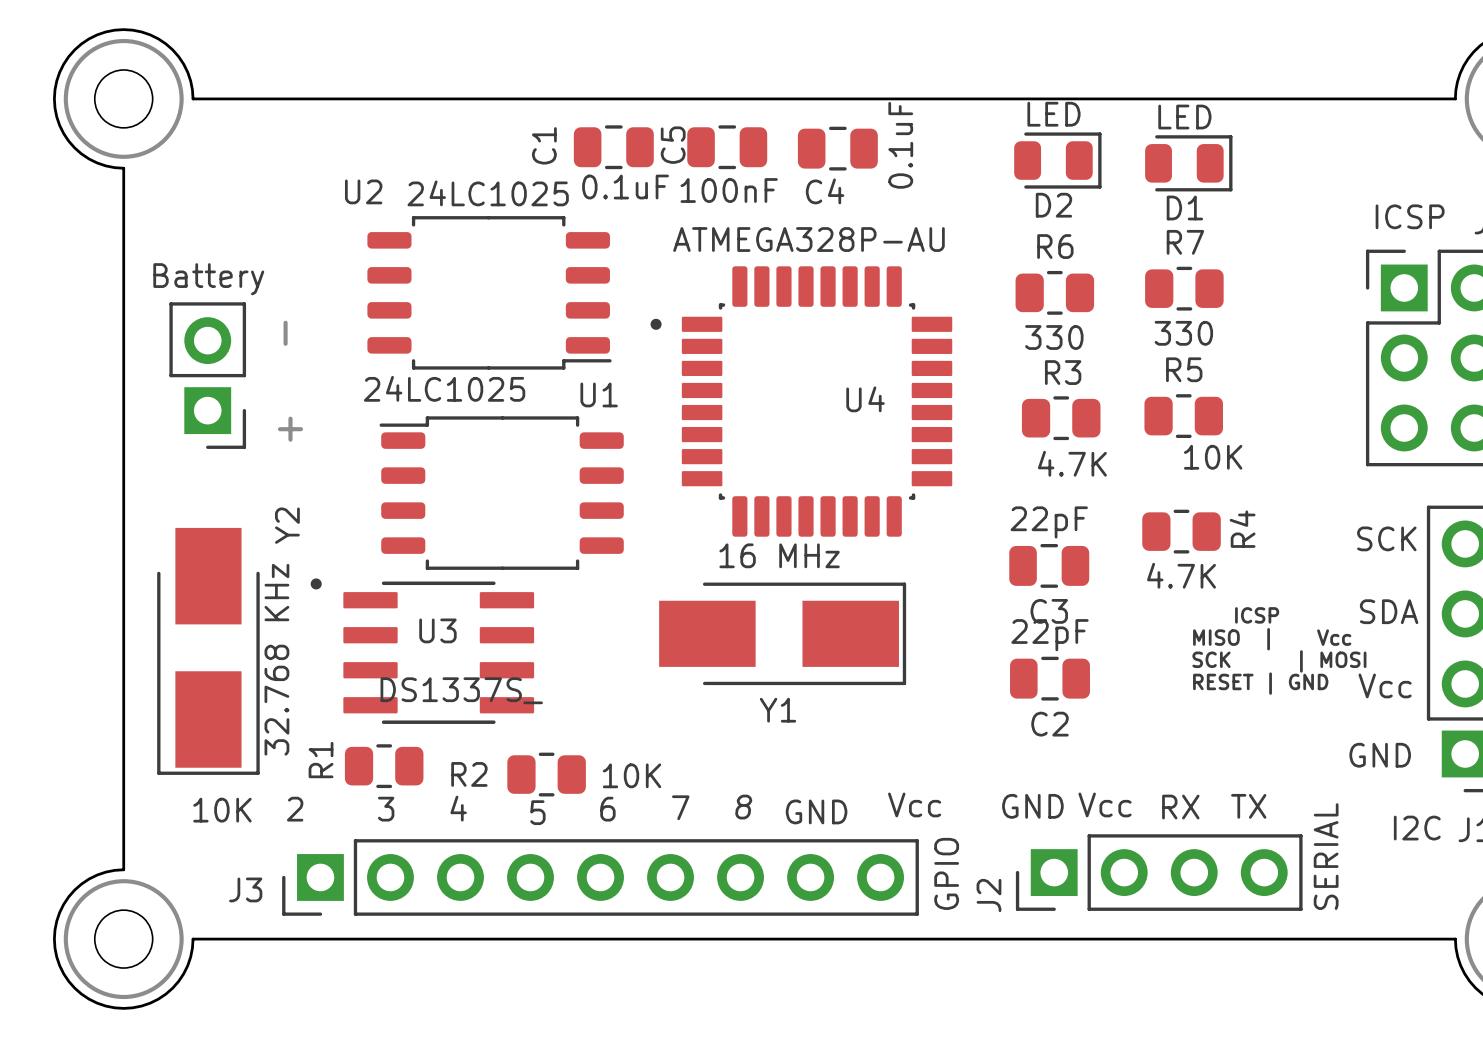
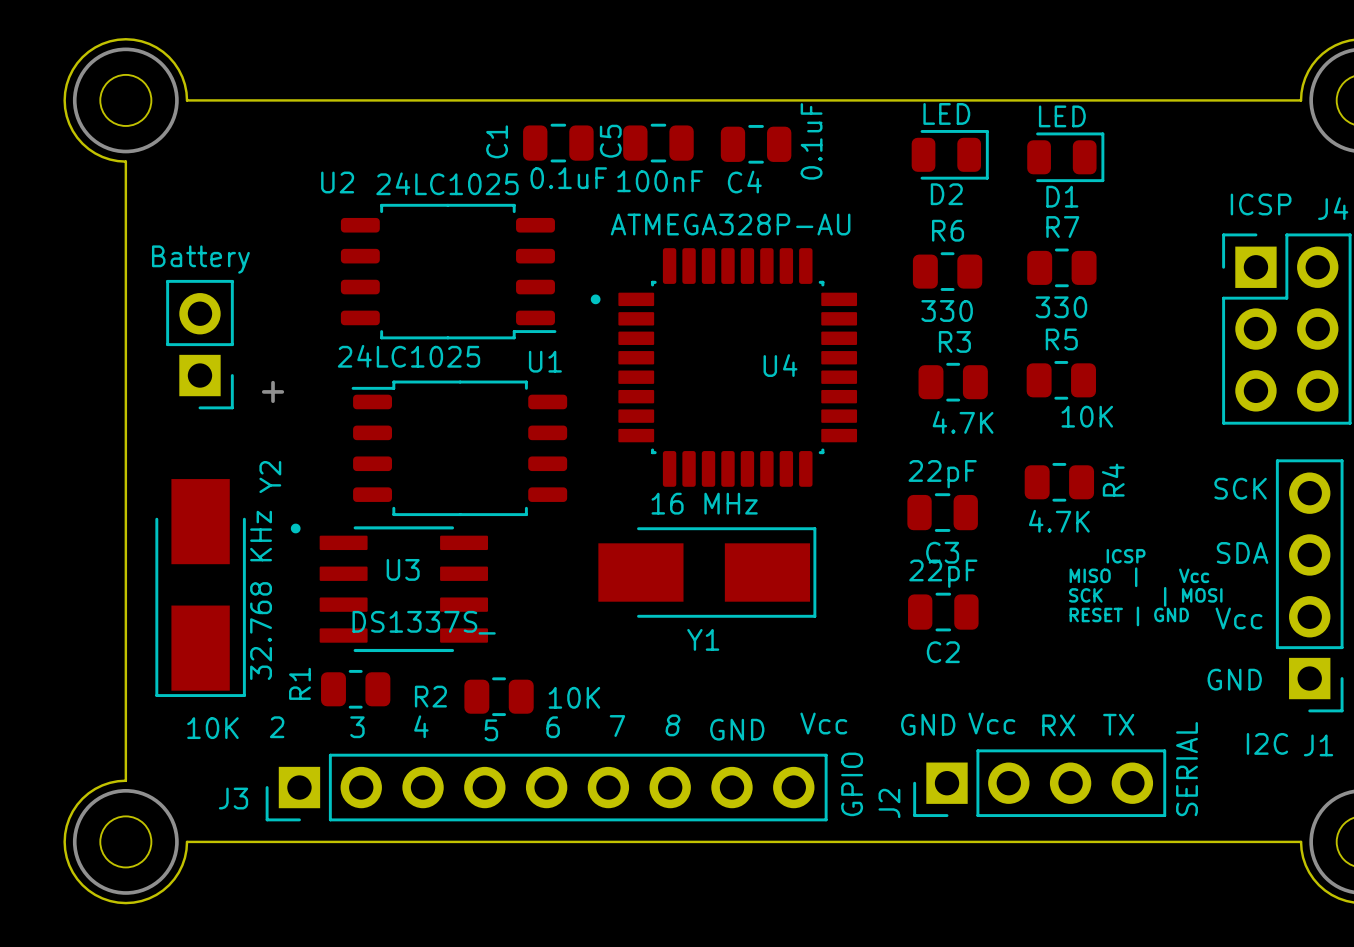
text: - (285, 333) -> none

